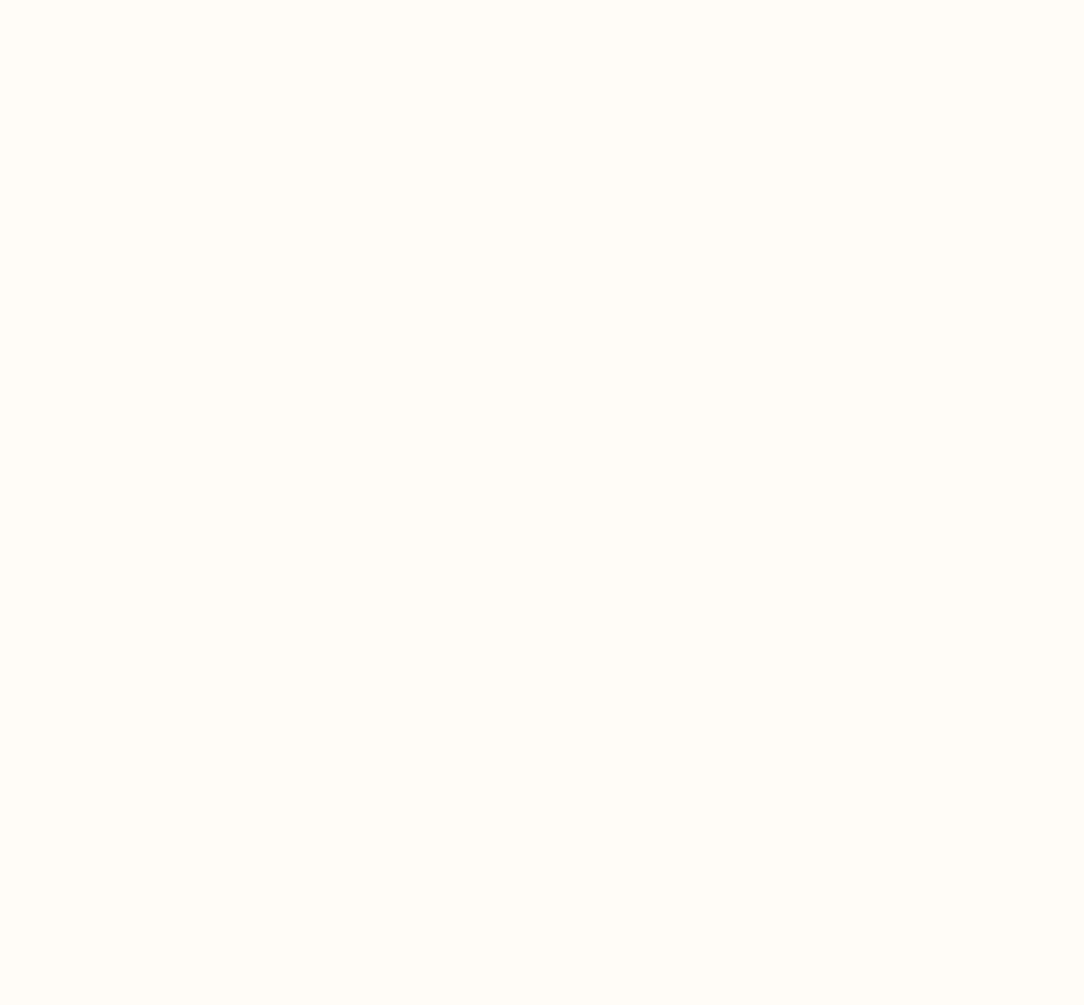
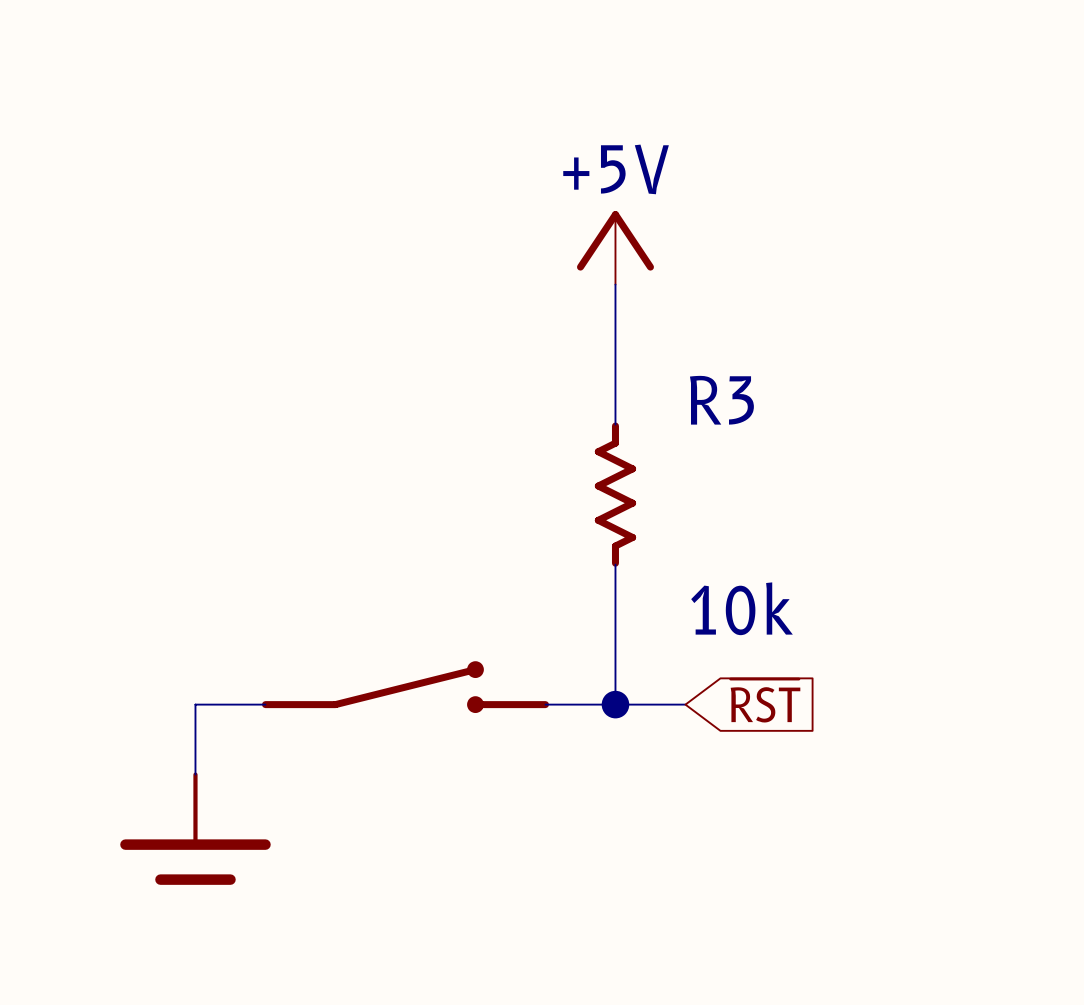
power symbol: none -> +5V (615, 247)
wire: none -> (615, 284) (615, 424)
R3: none -> 10k (615, 494)
wire: none -> (615, 564) (615, 704)
part: none -> (405, 687)
global label: none -> ~{RST} (765, 700)
wire: none -> (265, 704) (195, 704) (195, 774)
wire: none -> (545, 704) (685, 704)
junction: none -> (615, 704)
power symbol: none -> (195, 828)

